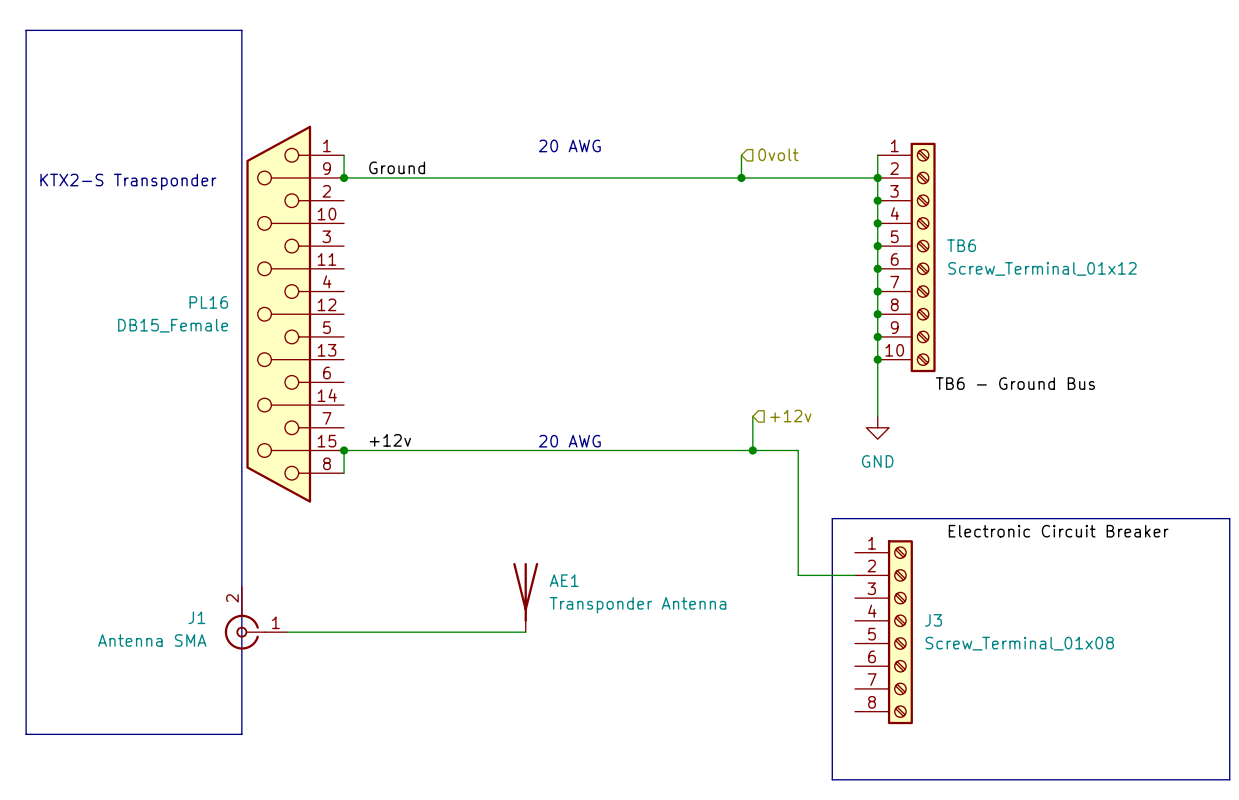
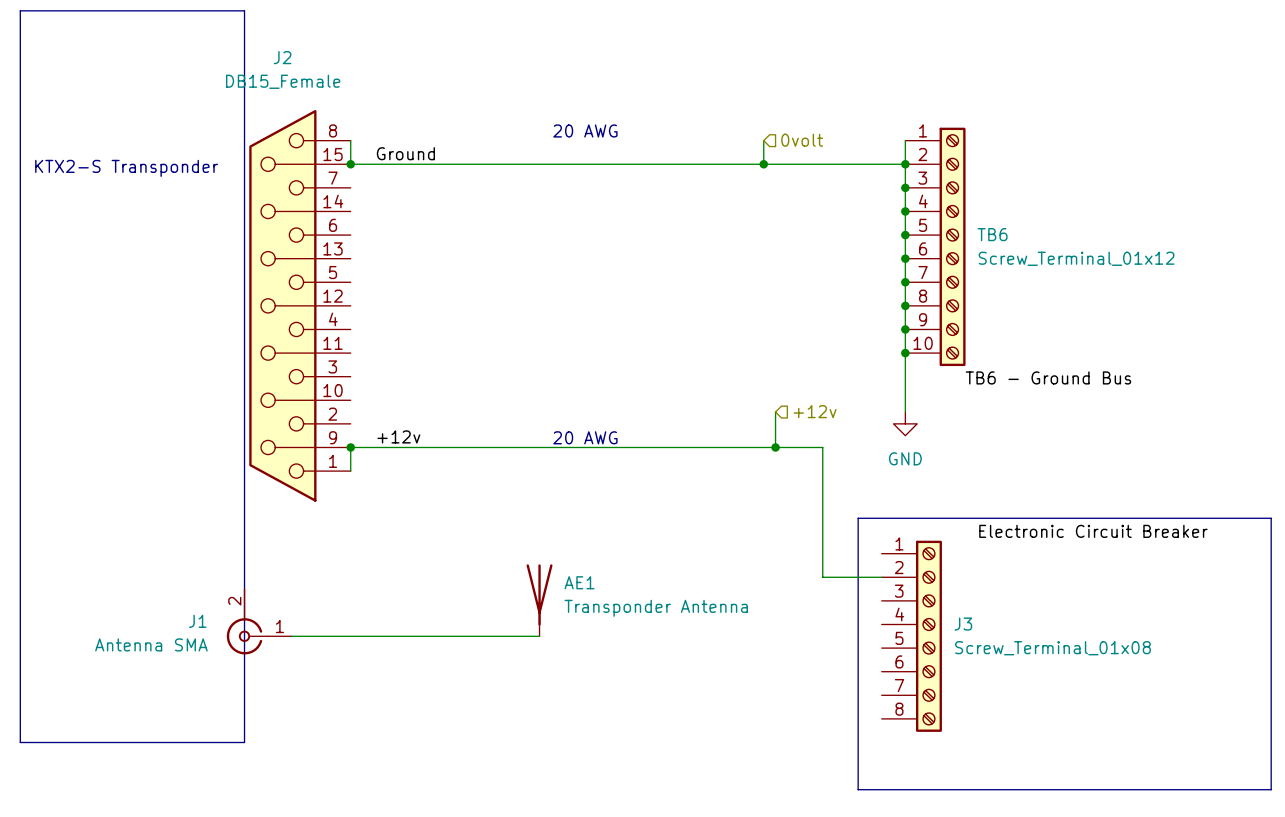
PL16 name: PL16 (208, 302) -> J2 (282, 57)
PL16 flip: as is (278, 314) -> up-down (282, 305)
PL16 value position: DB15_Female (173, 325) -> DB15_Female (283, 81)

